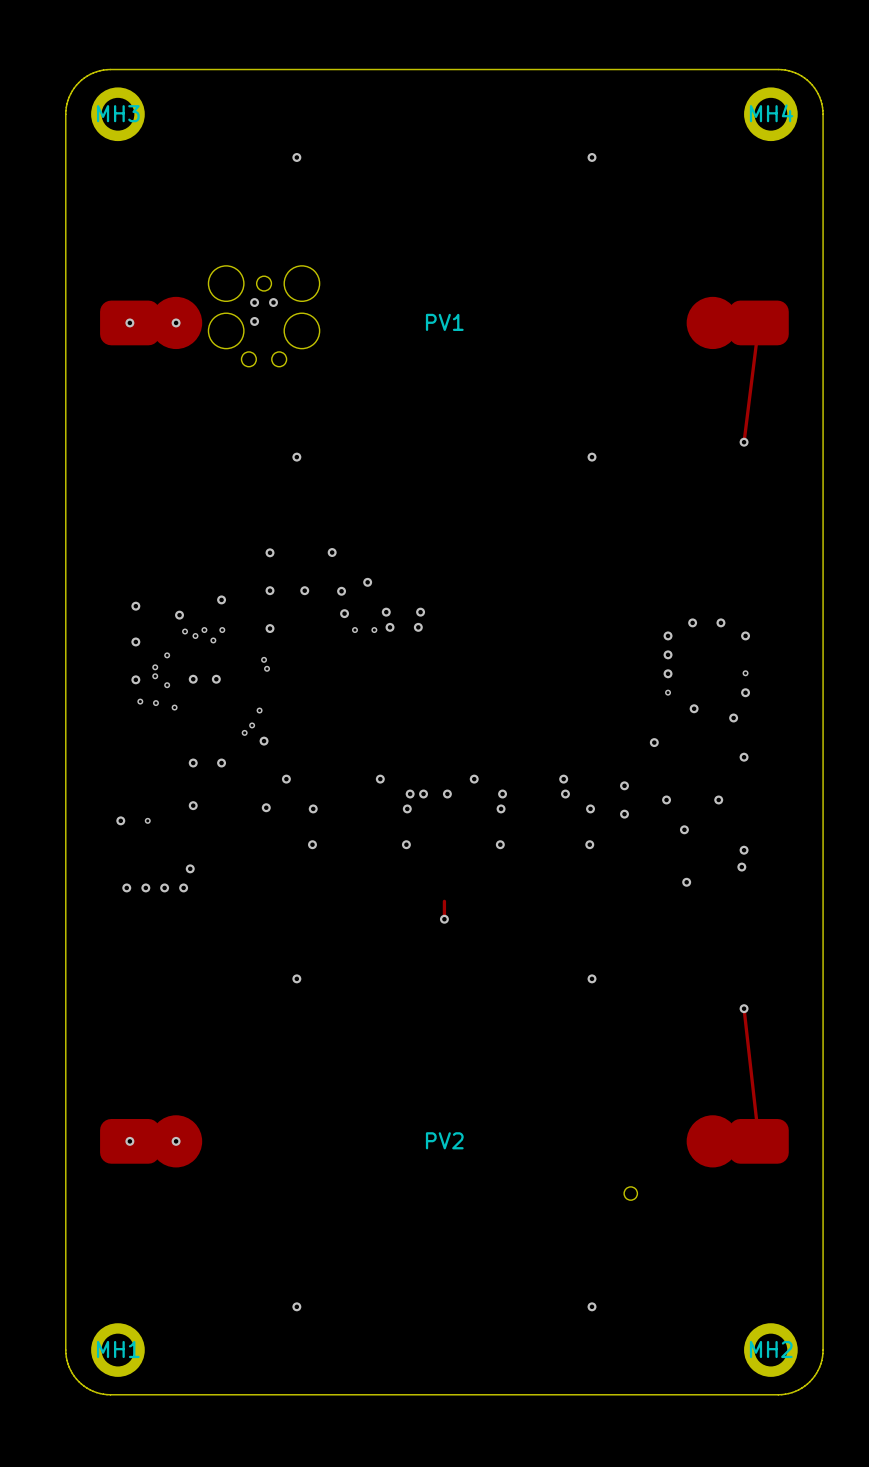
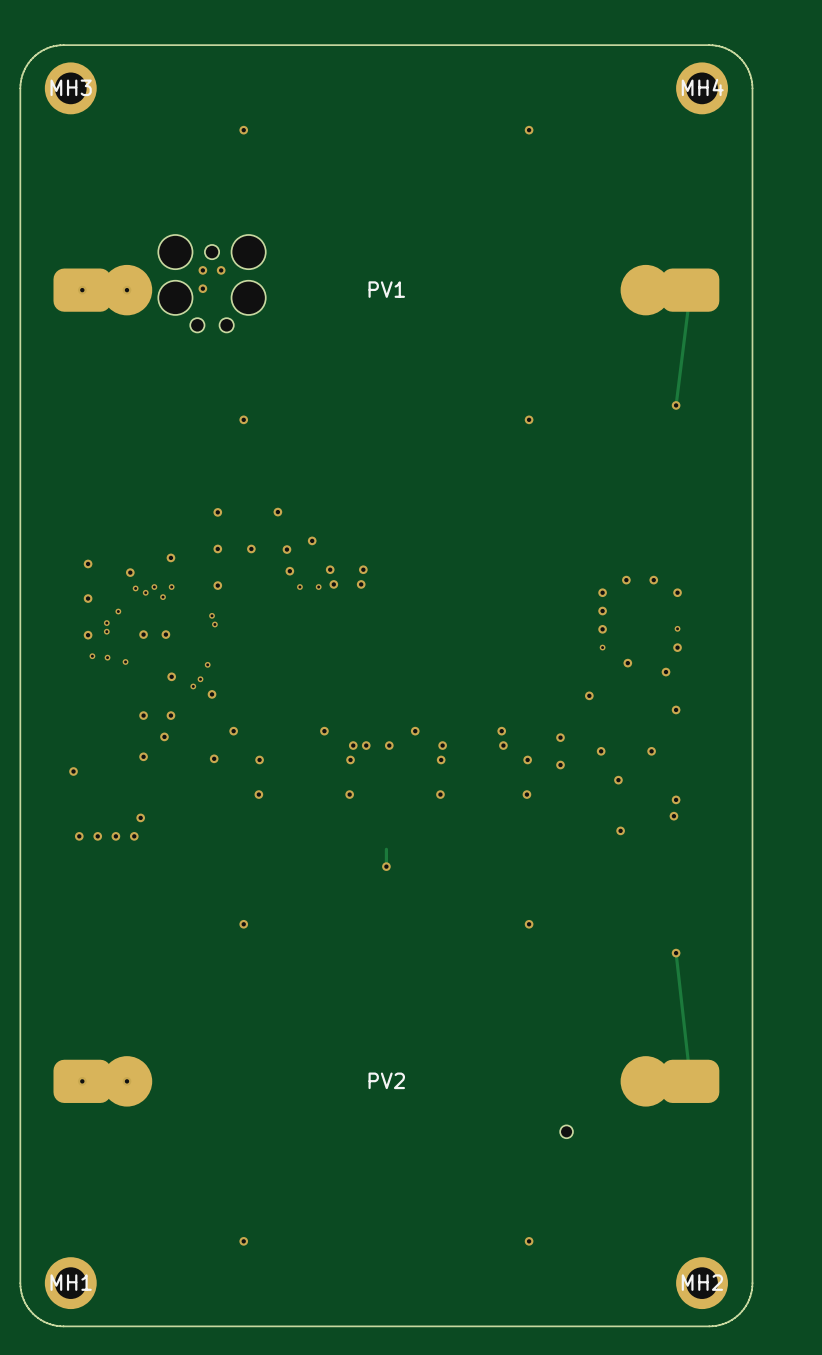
via: (167, 685) -> none
via: none -> (171, 676)
via: none -> (164, 736)
via: (147, 820) -> none

